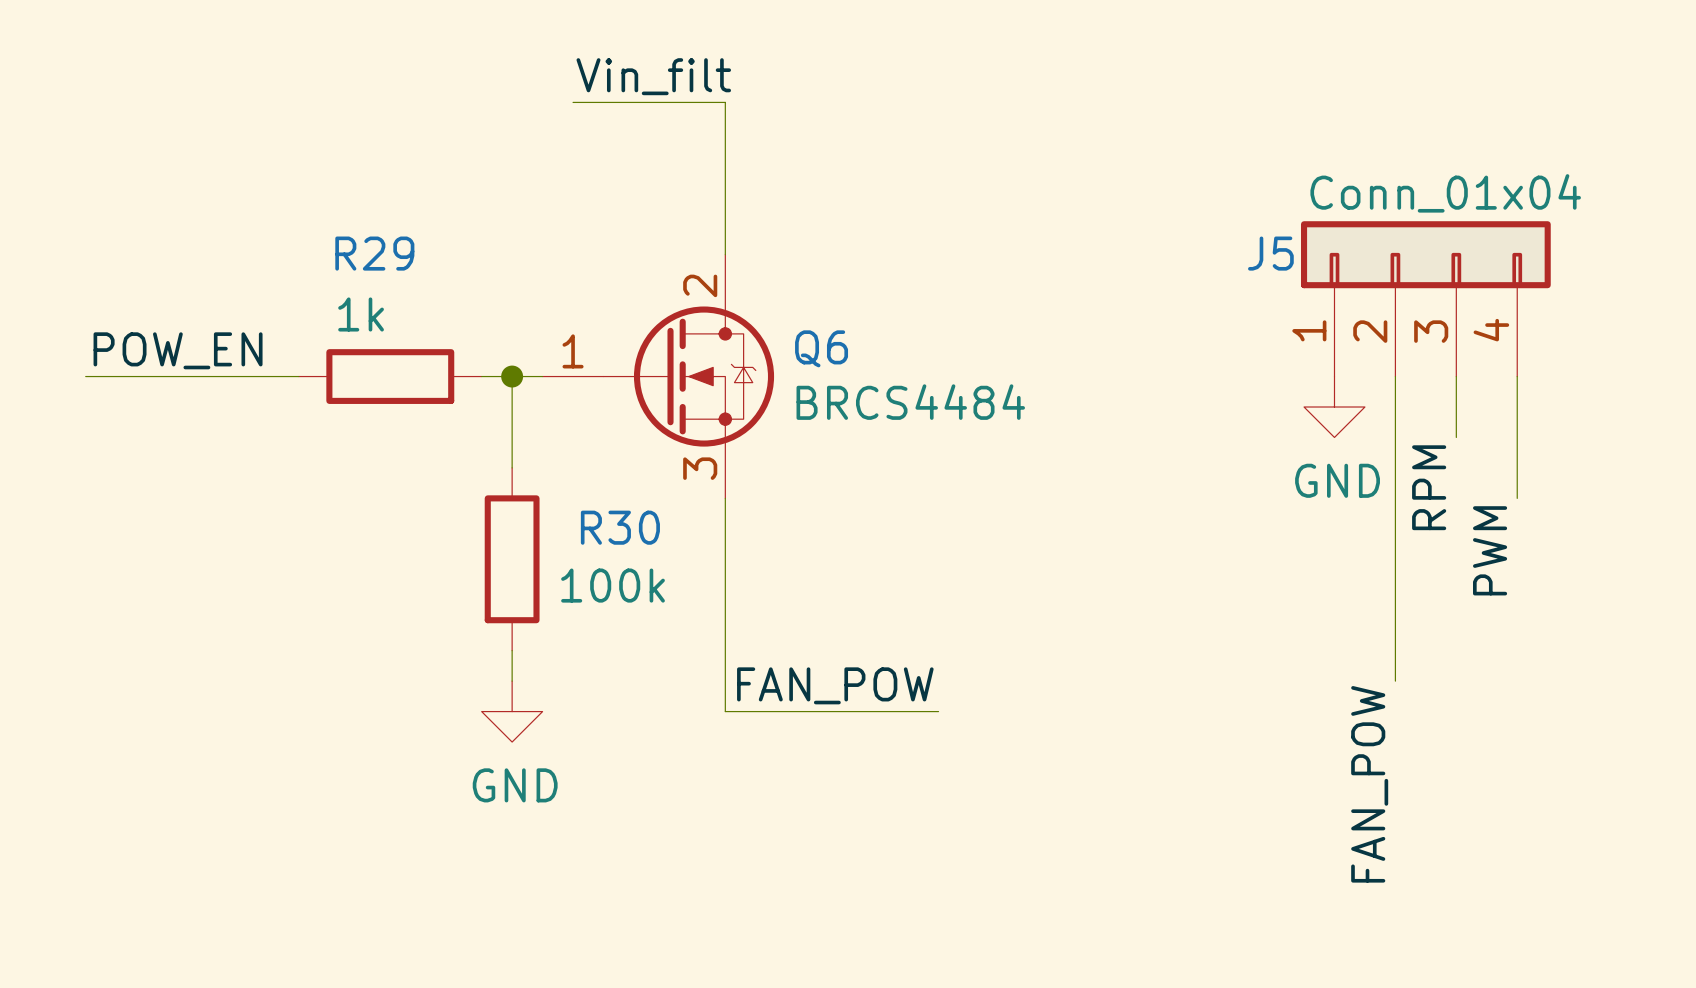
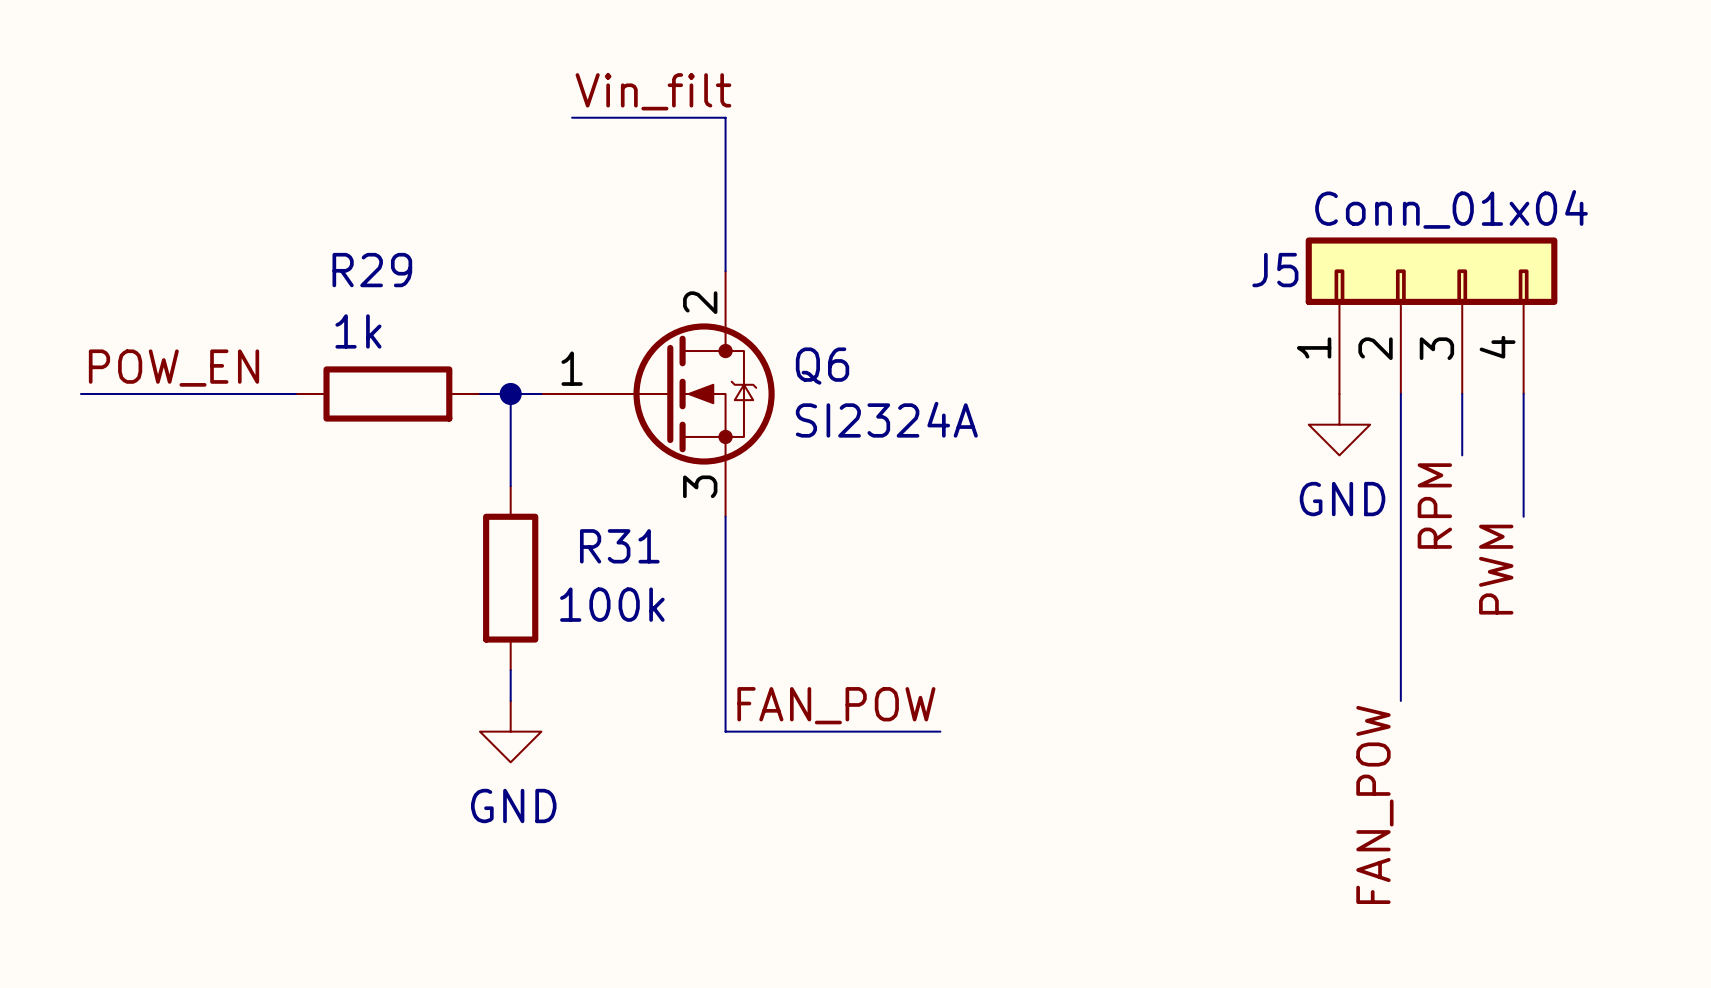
Q6 value: BRCS4484 (910, 402) -> SI2324A (886, 419)
R30 name: R30 (620, 527) -> R31 (619, 546)

